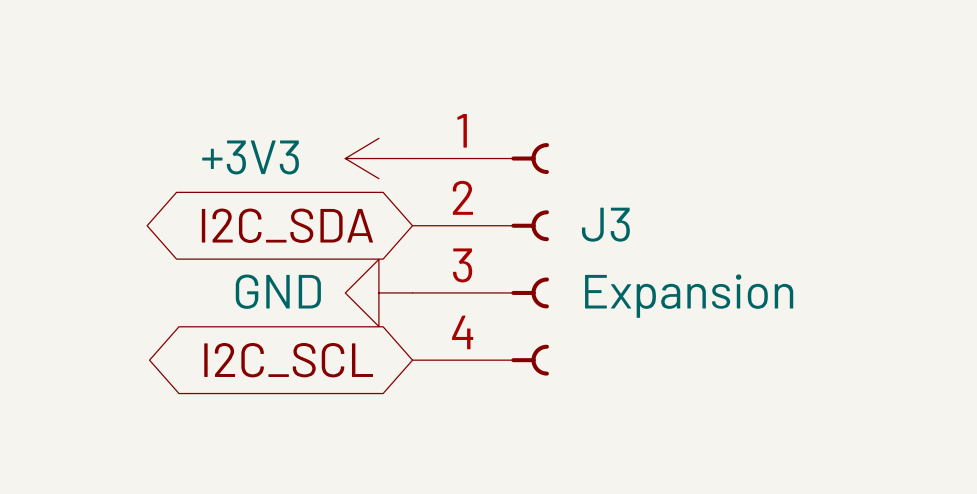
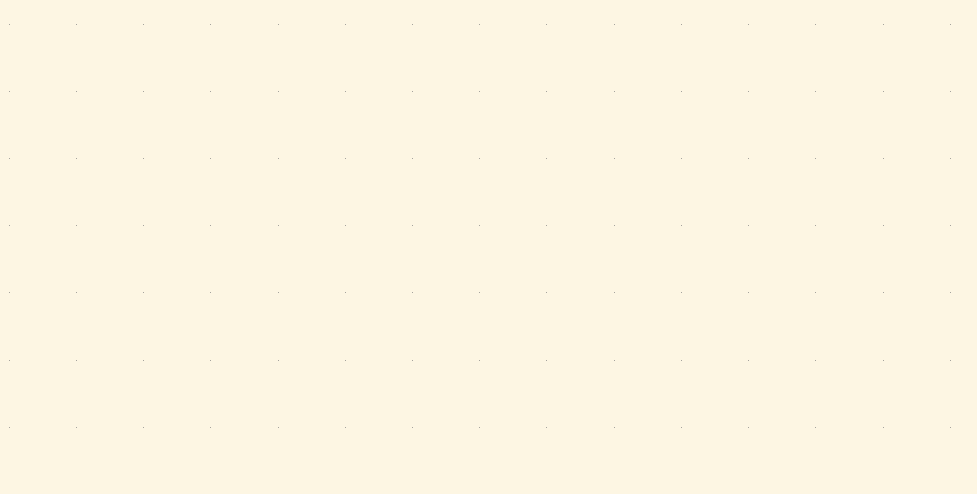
power symbol: +3V3 (378, 158) -> none
global label: I2C_SDA (287, 225) -> none
J3: Expansion (480, 259) -> none
power symbol: GND (378, 292) -> none
global label: I2C_SCL (288, 360) -> none

